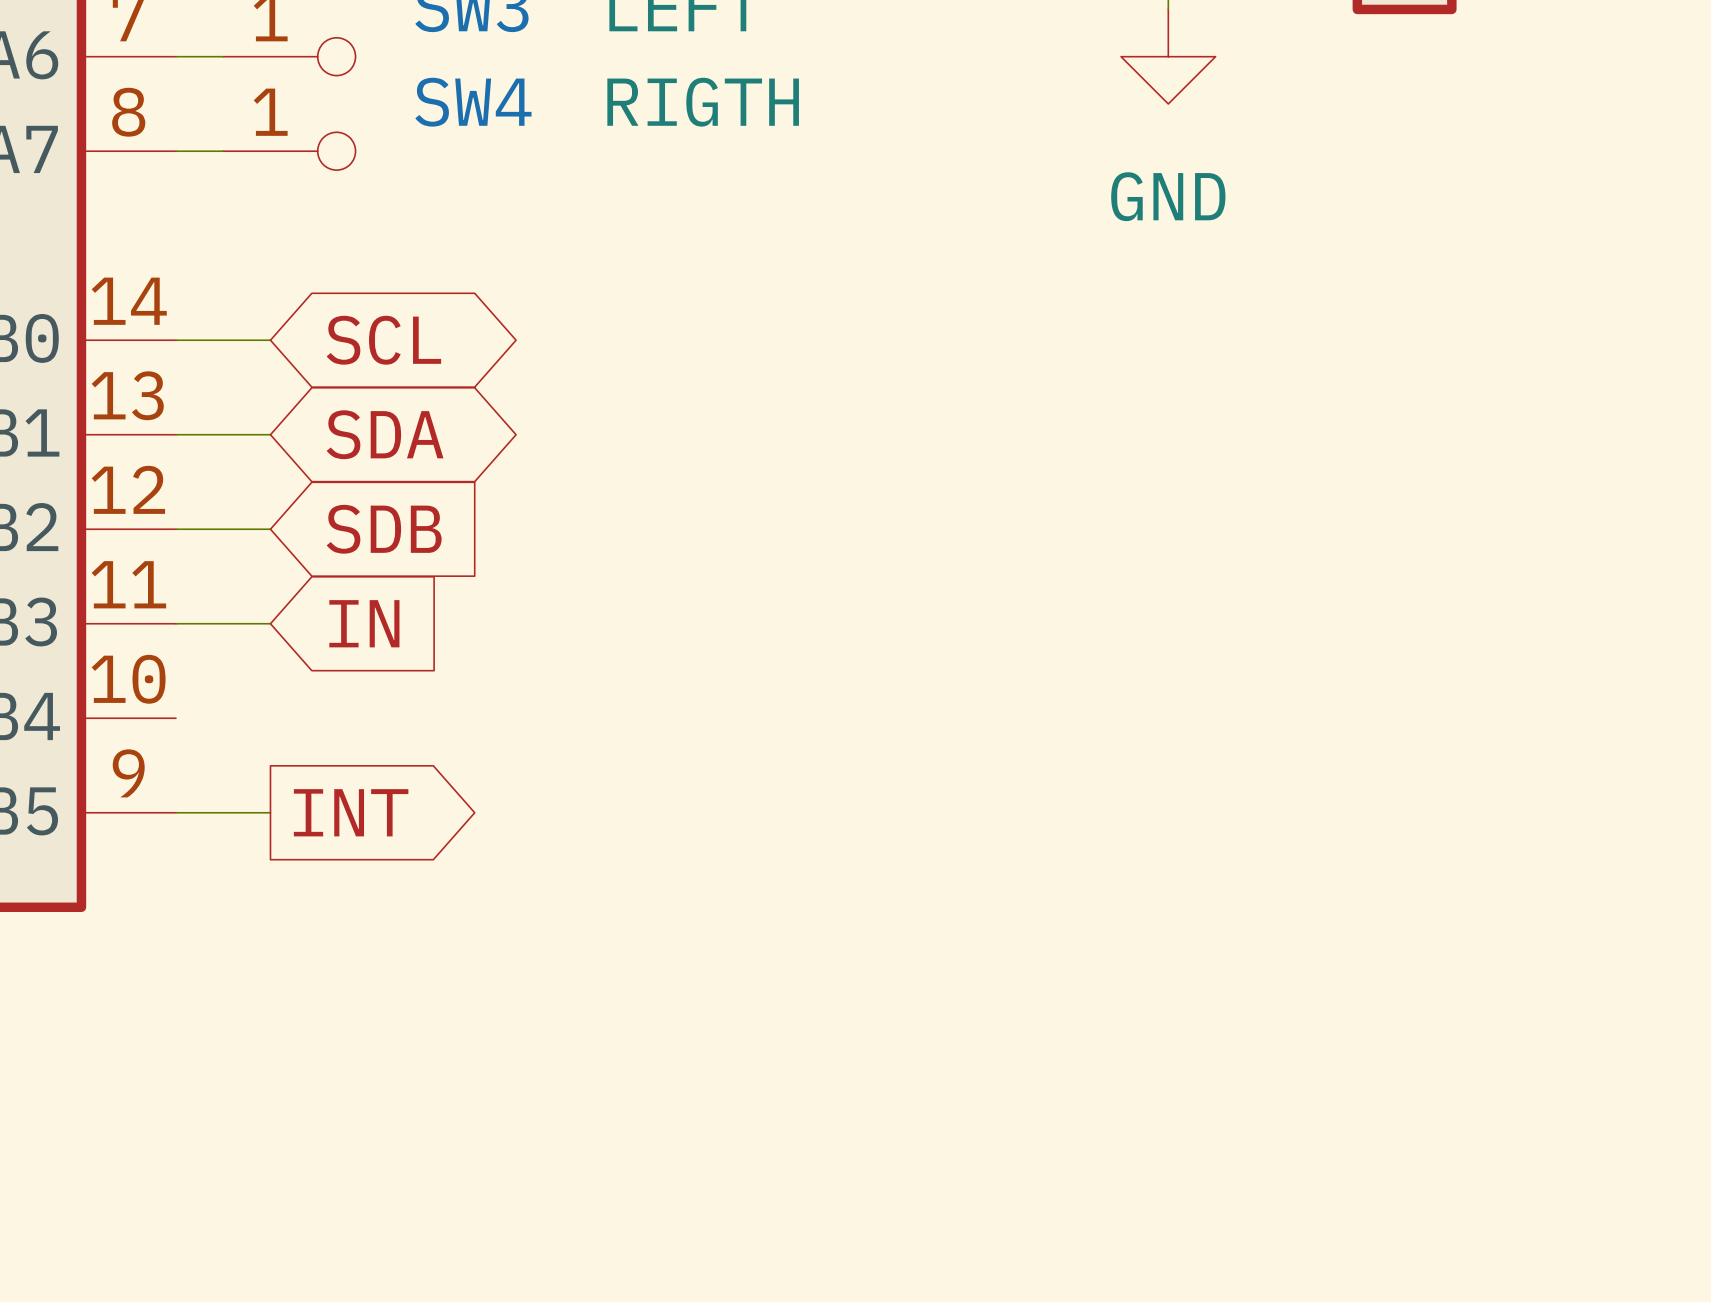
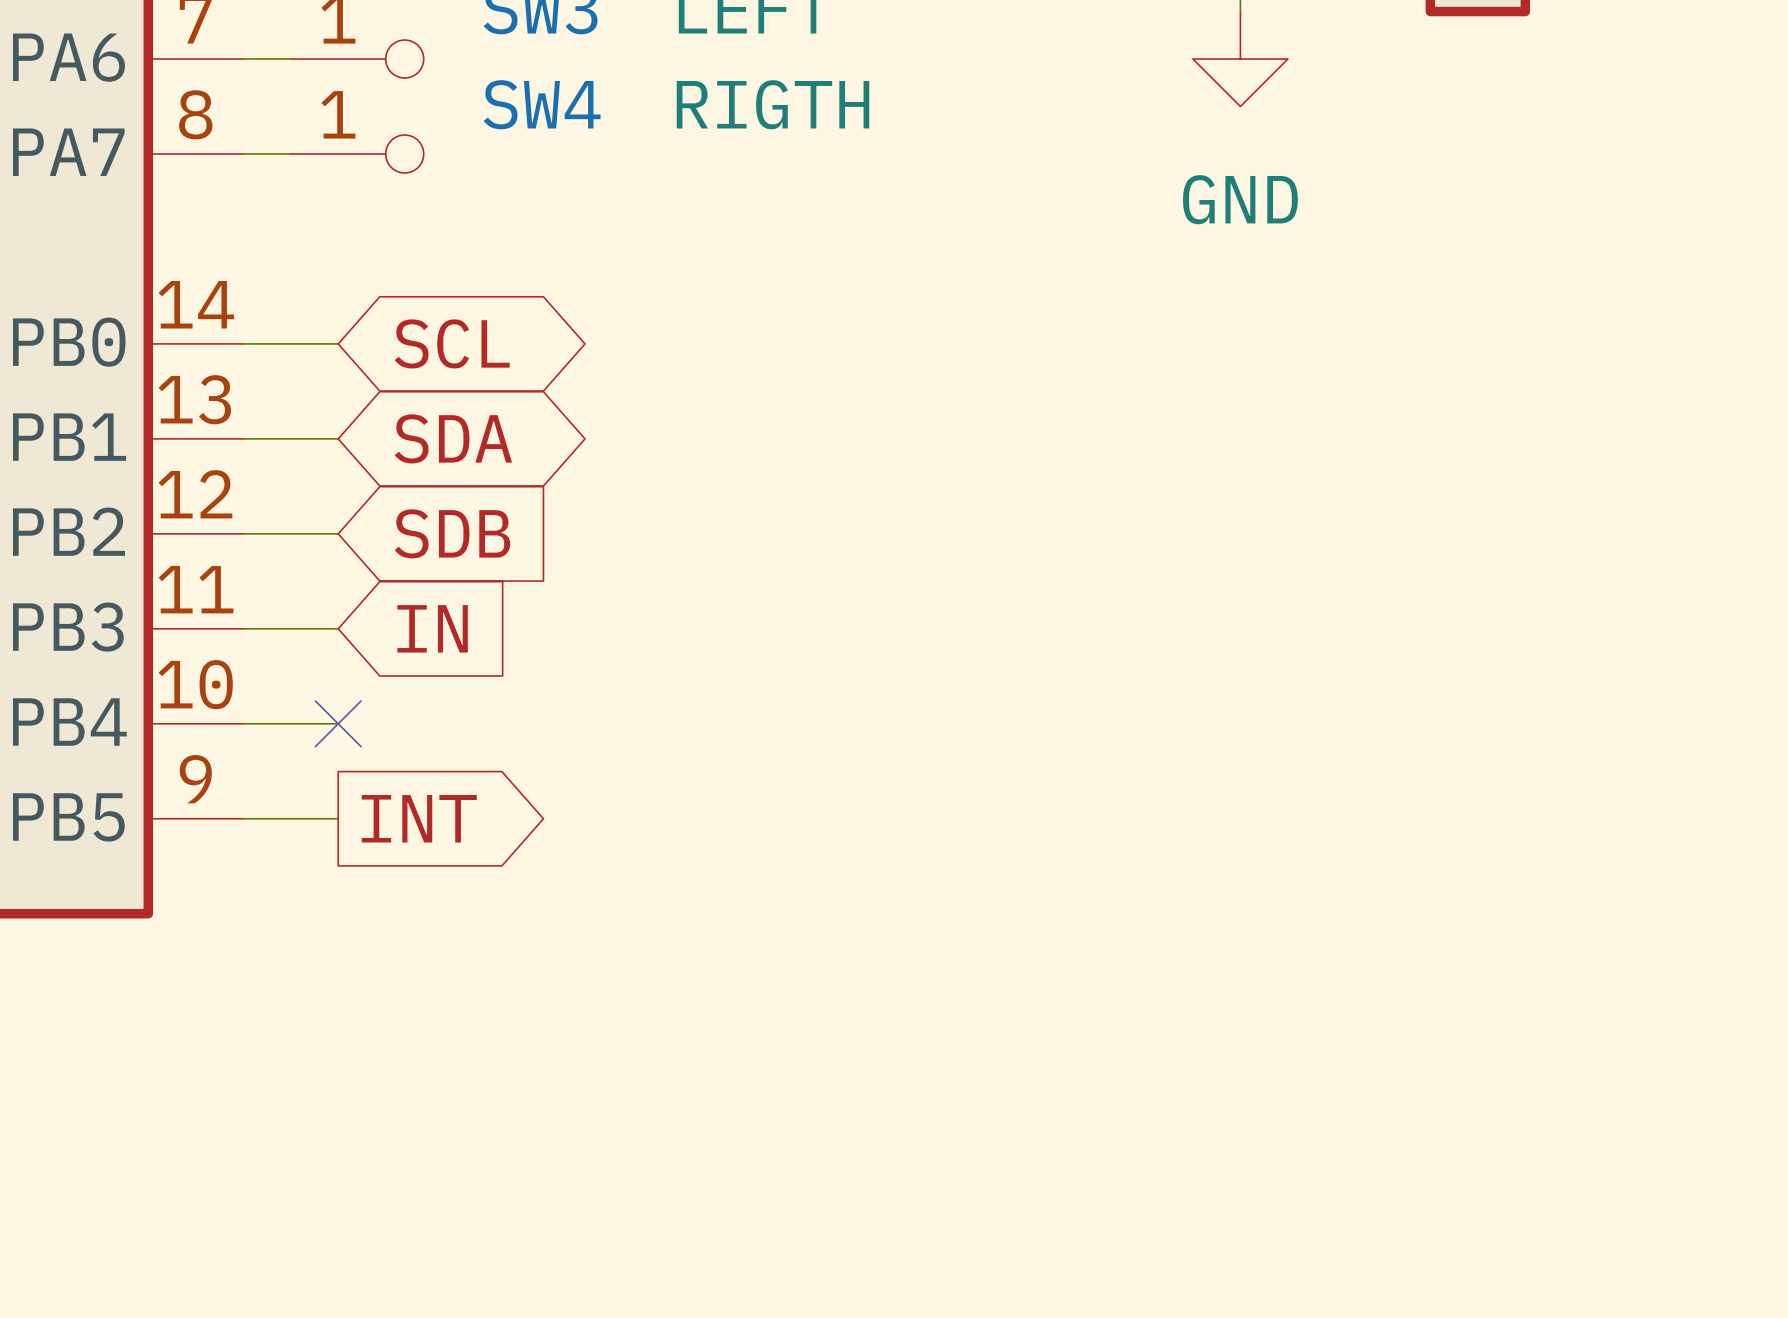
wire: none -> (243, 723) (338, 723)
no-connect mark: none -> (338, 723)

